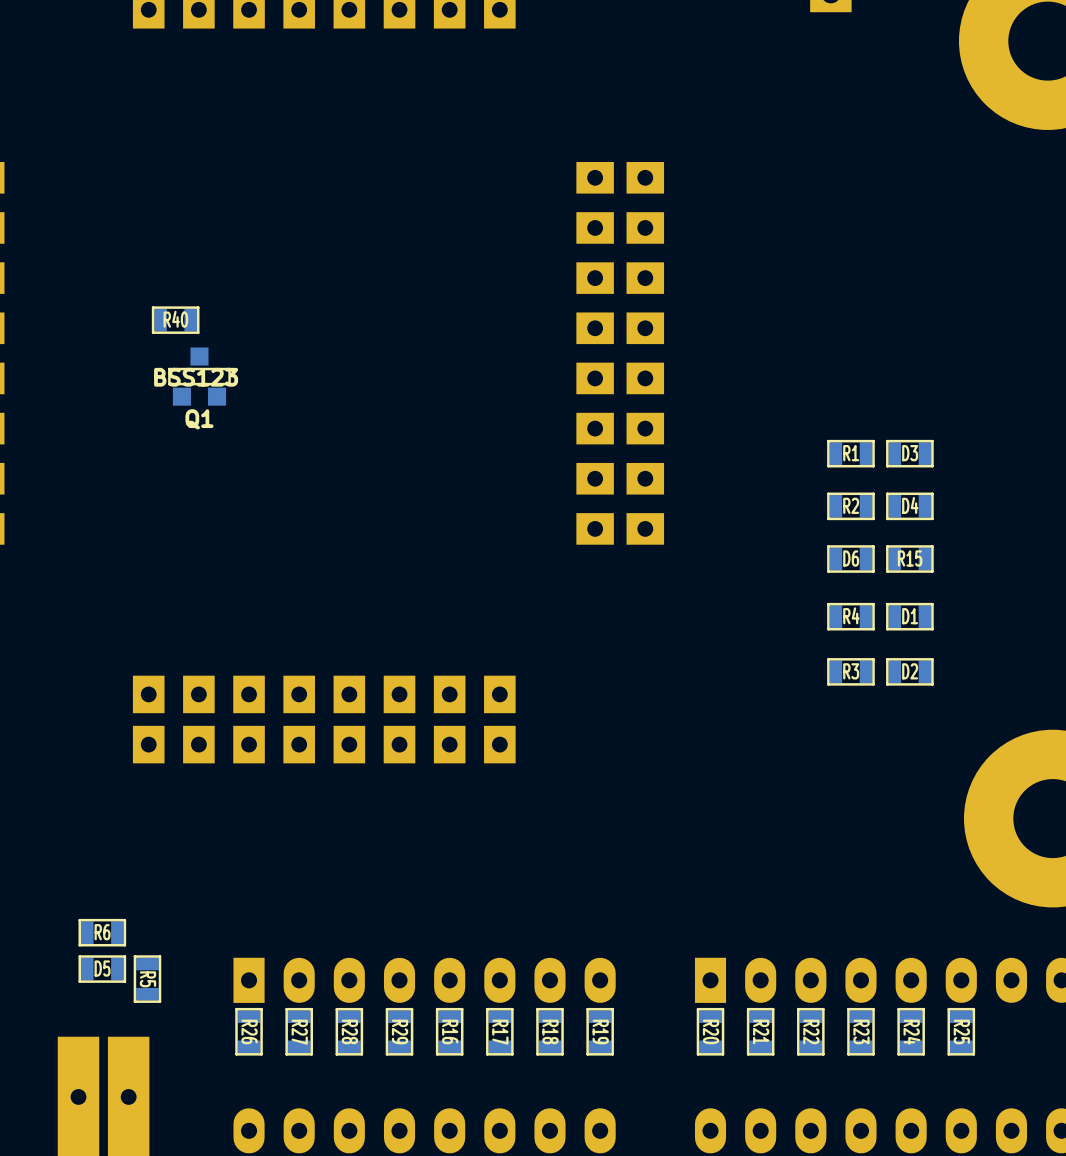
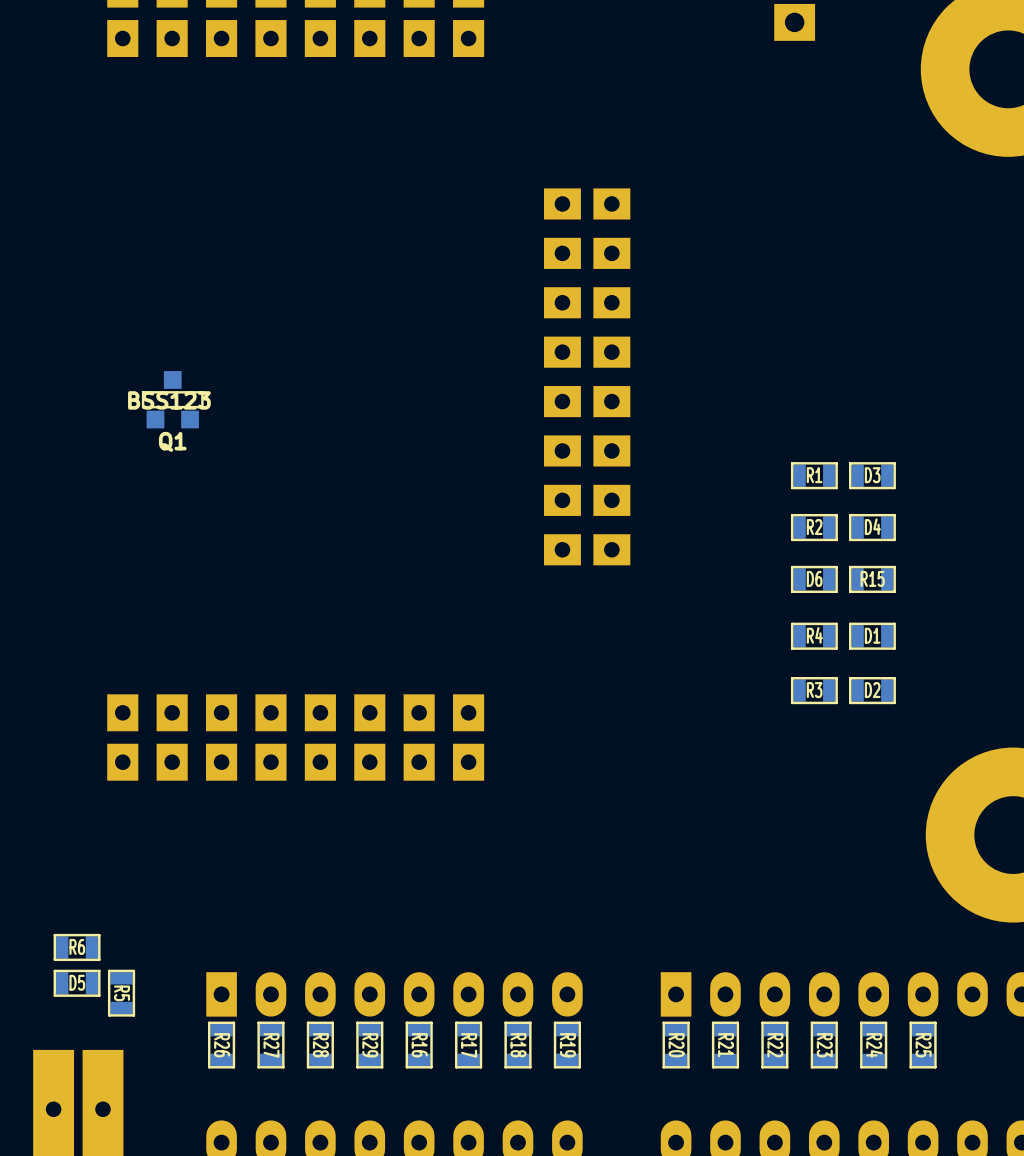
R40: (175, 320) -> none

